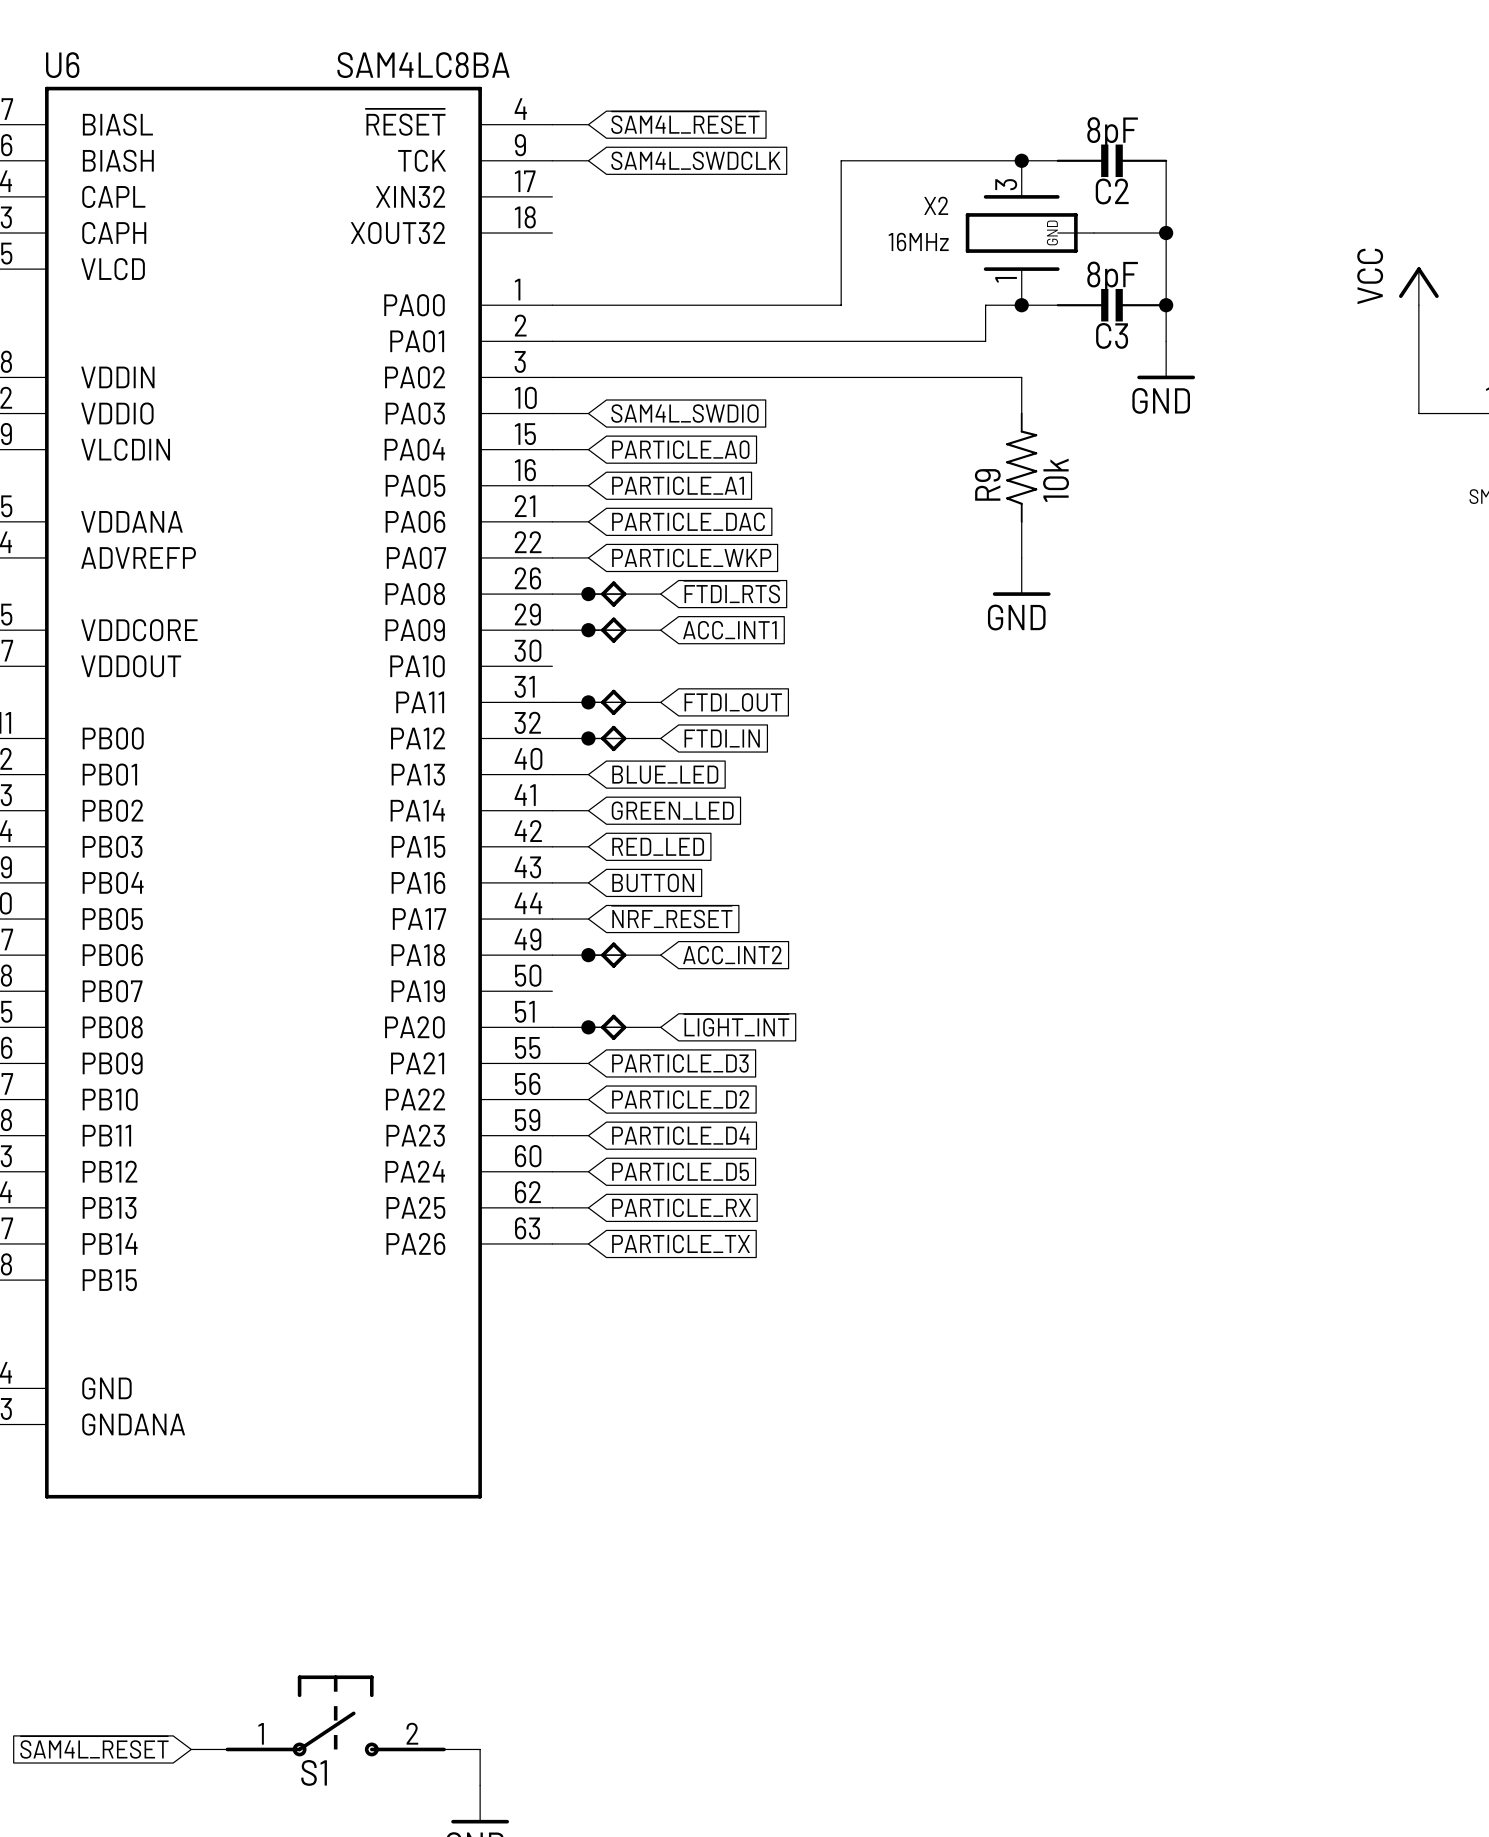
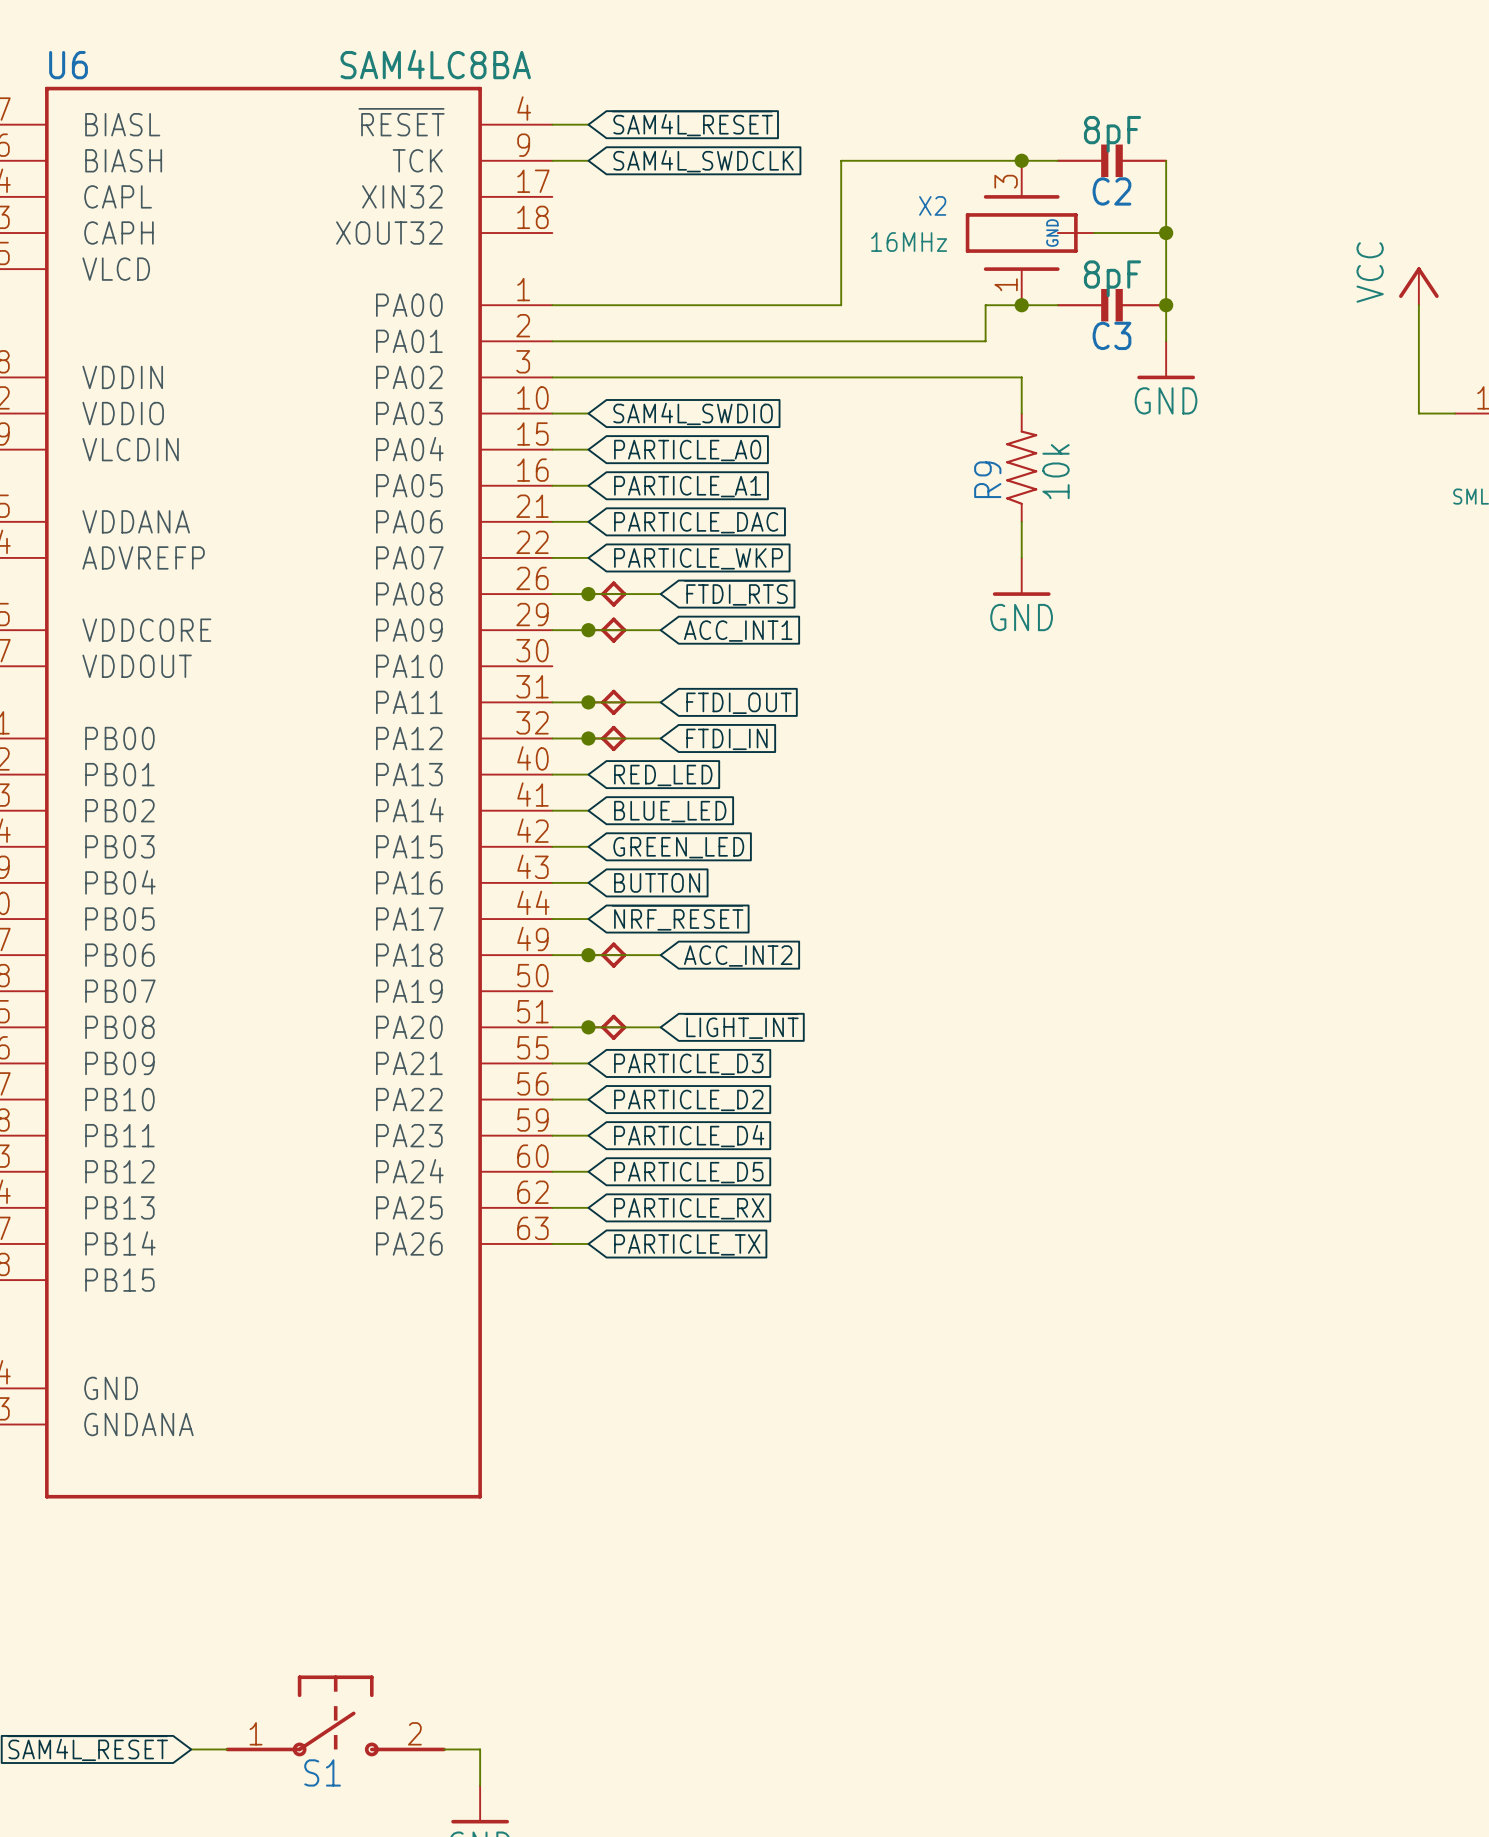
global label: BLUE_LED (665, 774) -> RED_LED (663, 775)
global label: GREEN_LED (672, 810) -> BLUE_LED (670, 811)
global label: RED_LED (658, 846) -> GREEN_LED (678, 847)

